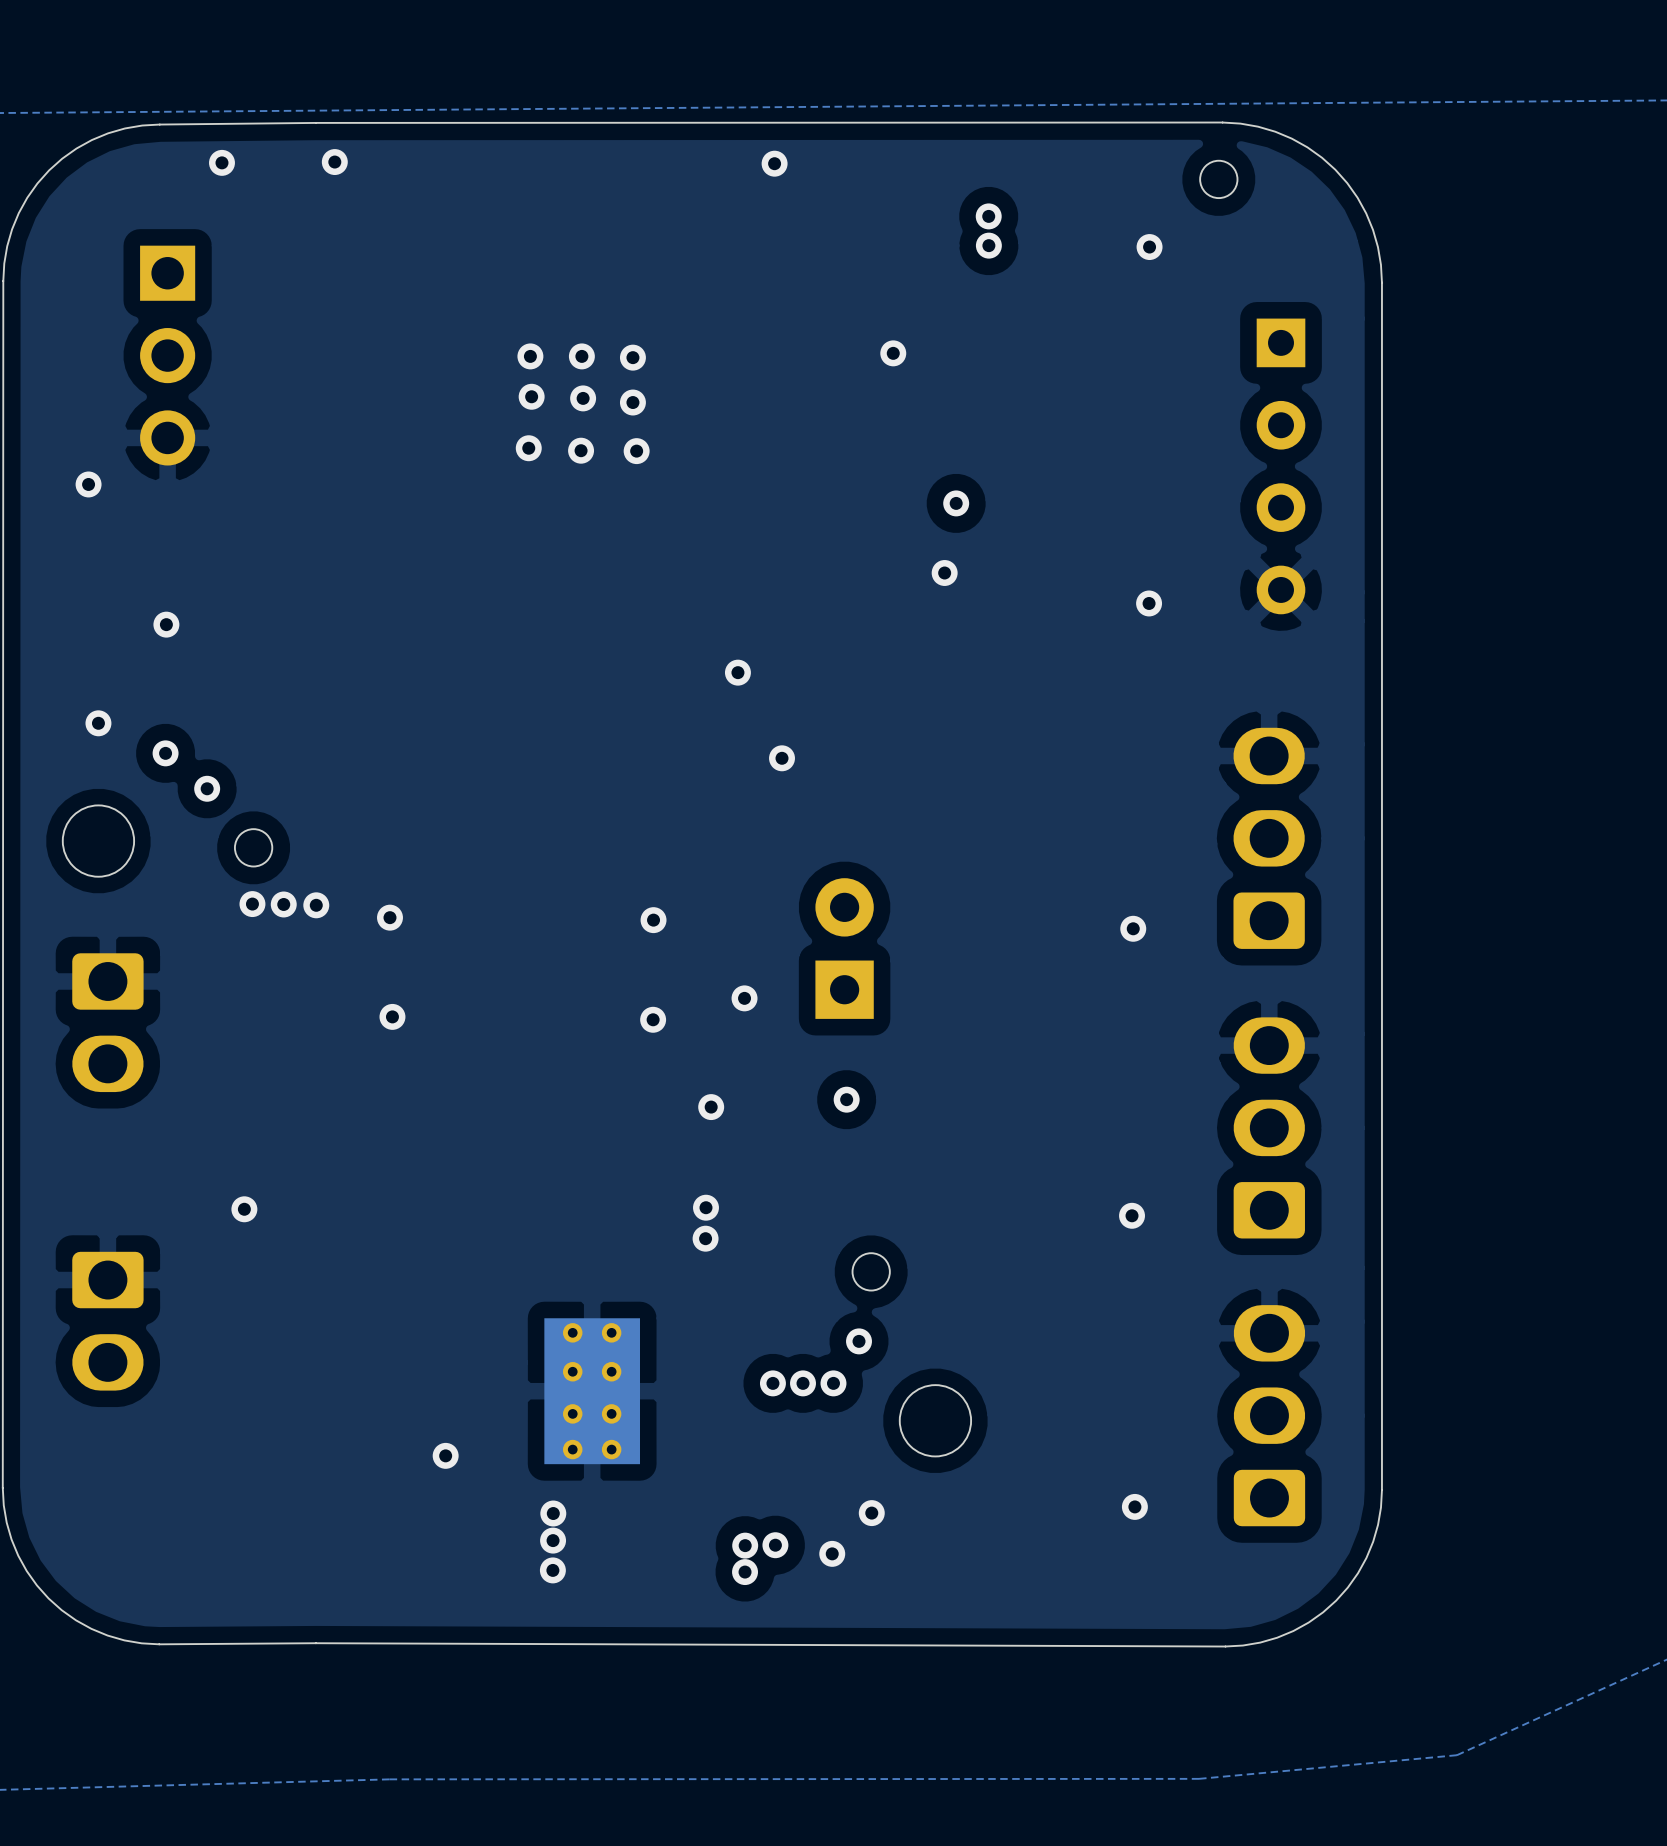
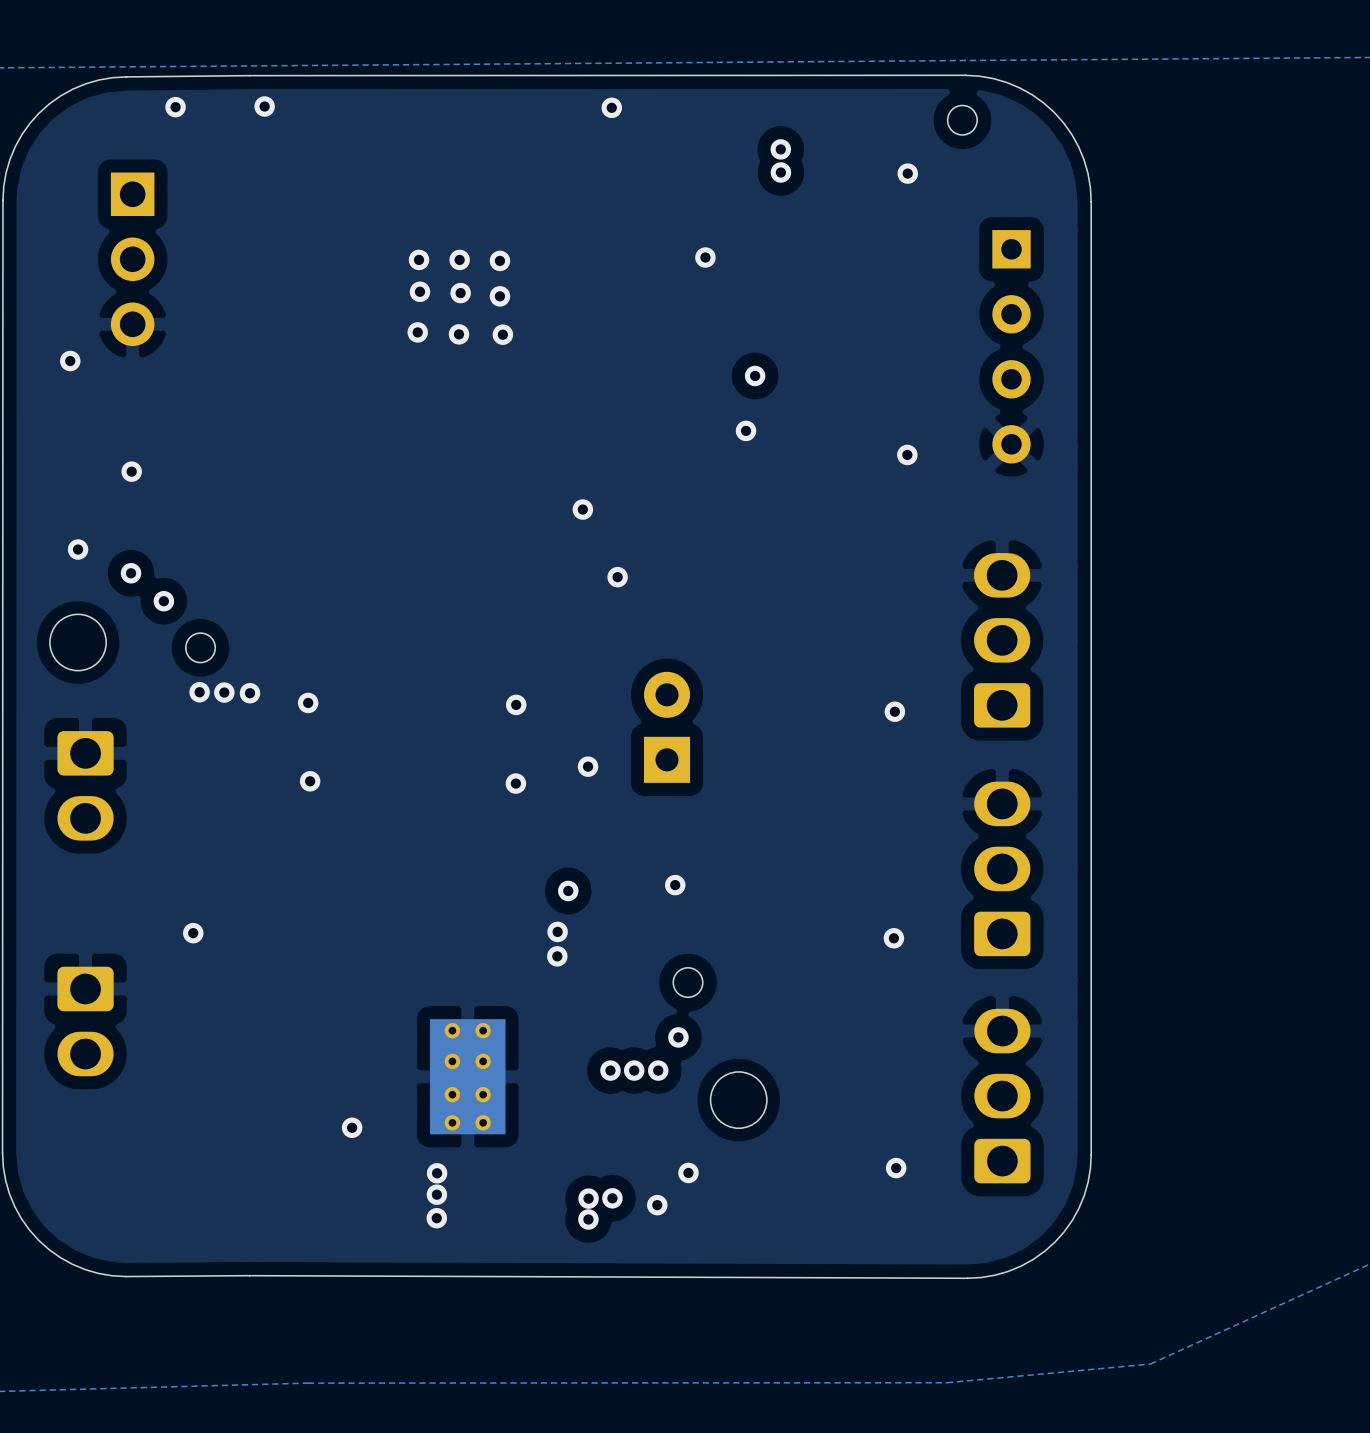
via position: (846, 1099) -> (675, 885)
via position: (711, 1107) -> (568, 890)

